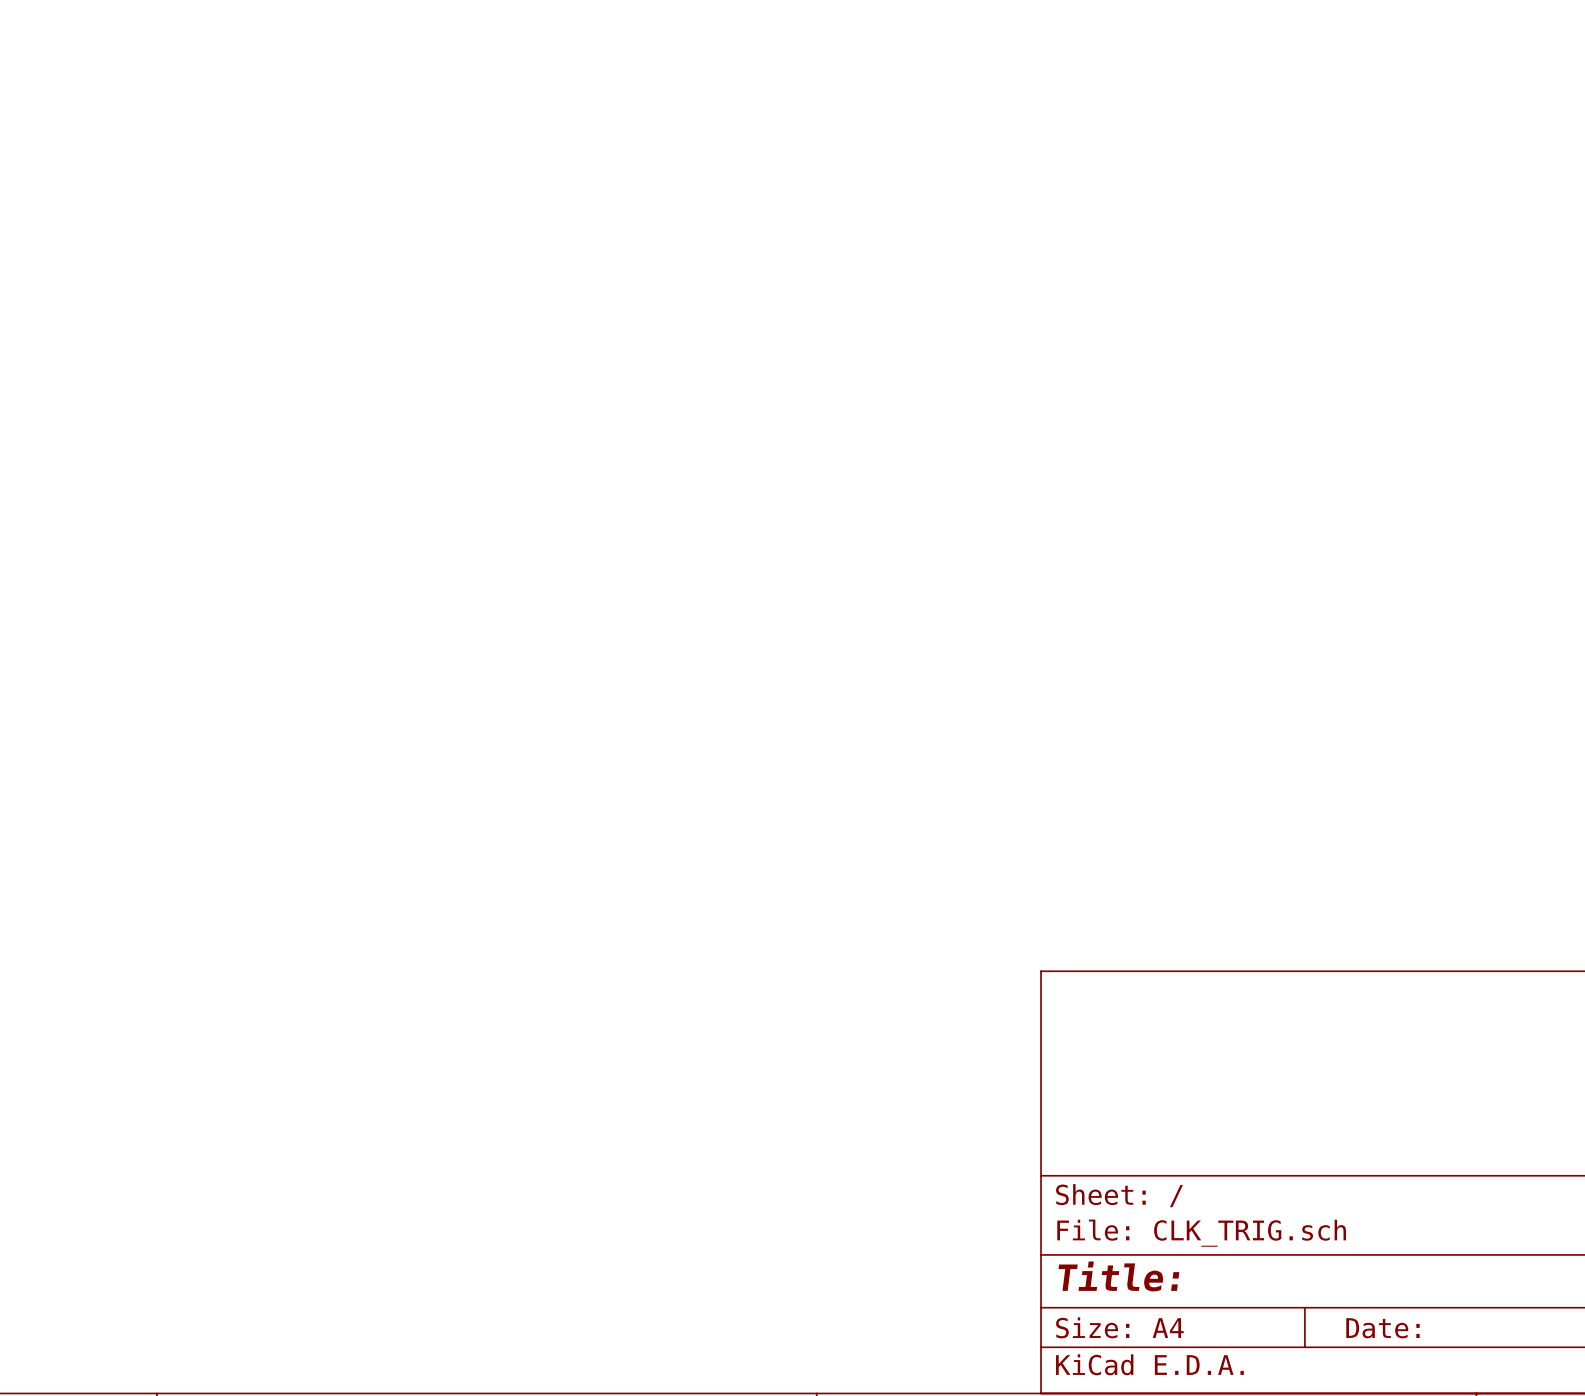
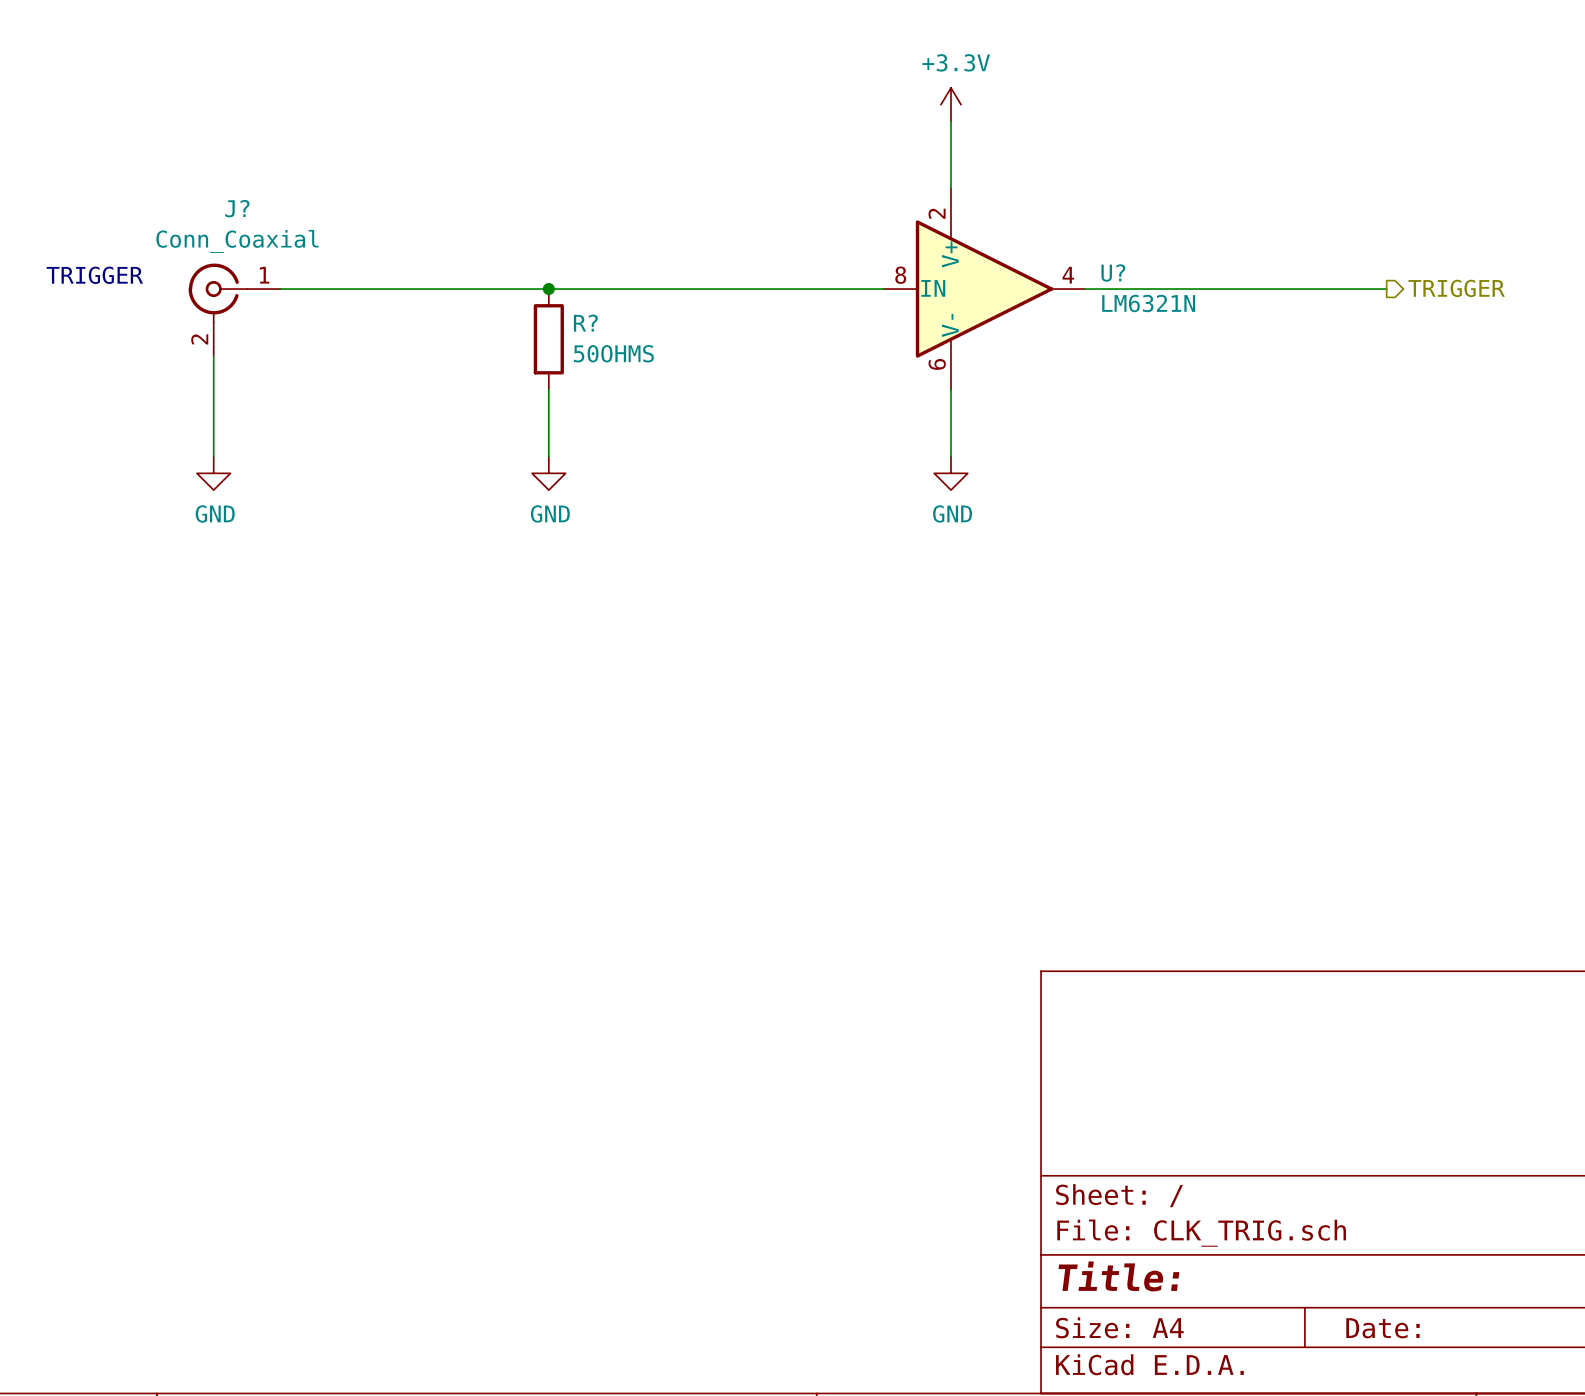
power symbol: none -> +3.3V (950, 104)
wire: none -> (950, 121) (950, 188)
text: none -> TRIGGER (94, 275)
hierarchical label: none -> TRIGGER (1456, 288)
wire: none -> (280, 289) (883, 289)
junction: none -> (548, 289)
U?: none -> LM6321N (984, 289)
wire: none -> (1085, 289) (1386, 289)
J?: none -> Conn_Coaxial (234, 309)
R?: none -> 50OHMS (548, 339)
wire: none -> (213, 356) (213, 456)
wire: none -> (548, 389) (548, 456)
wire: none -> (950, 389) (950, 456)
power symbol: none -> GND (213, 473)
power symbol: none -> GND (548, 473)
power symbol: none -> GND (950, 473)

